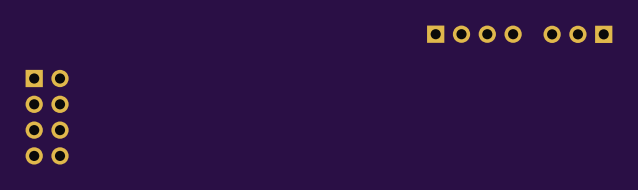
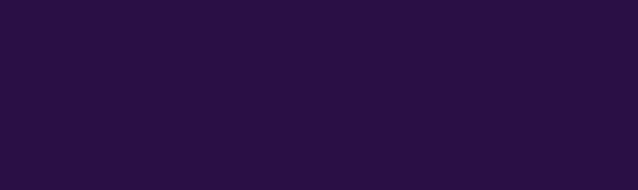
part: (474, 34) -> none
part: (577, 34) -> none
part: (47, 117) -> none

